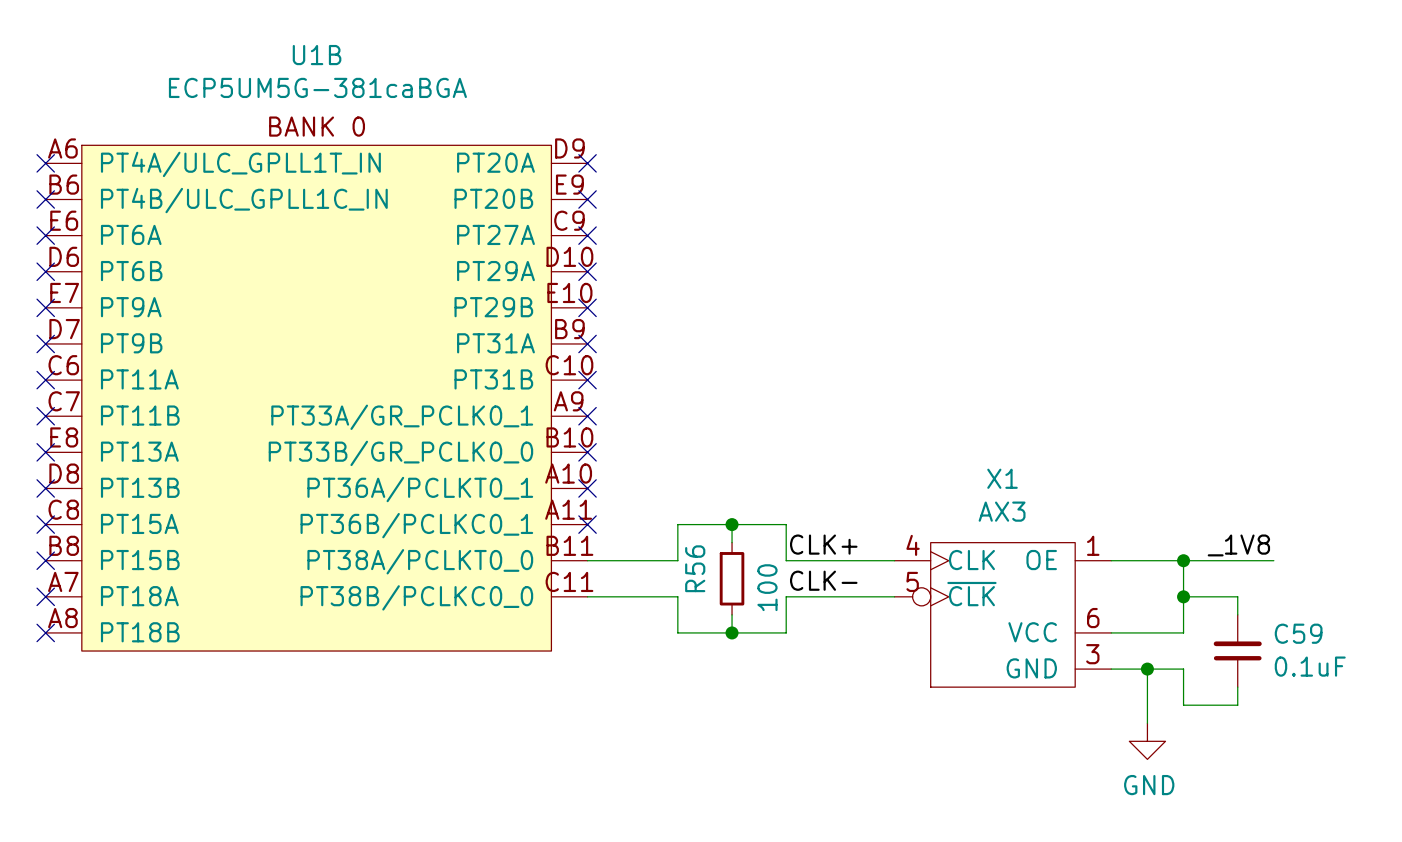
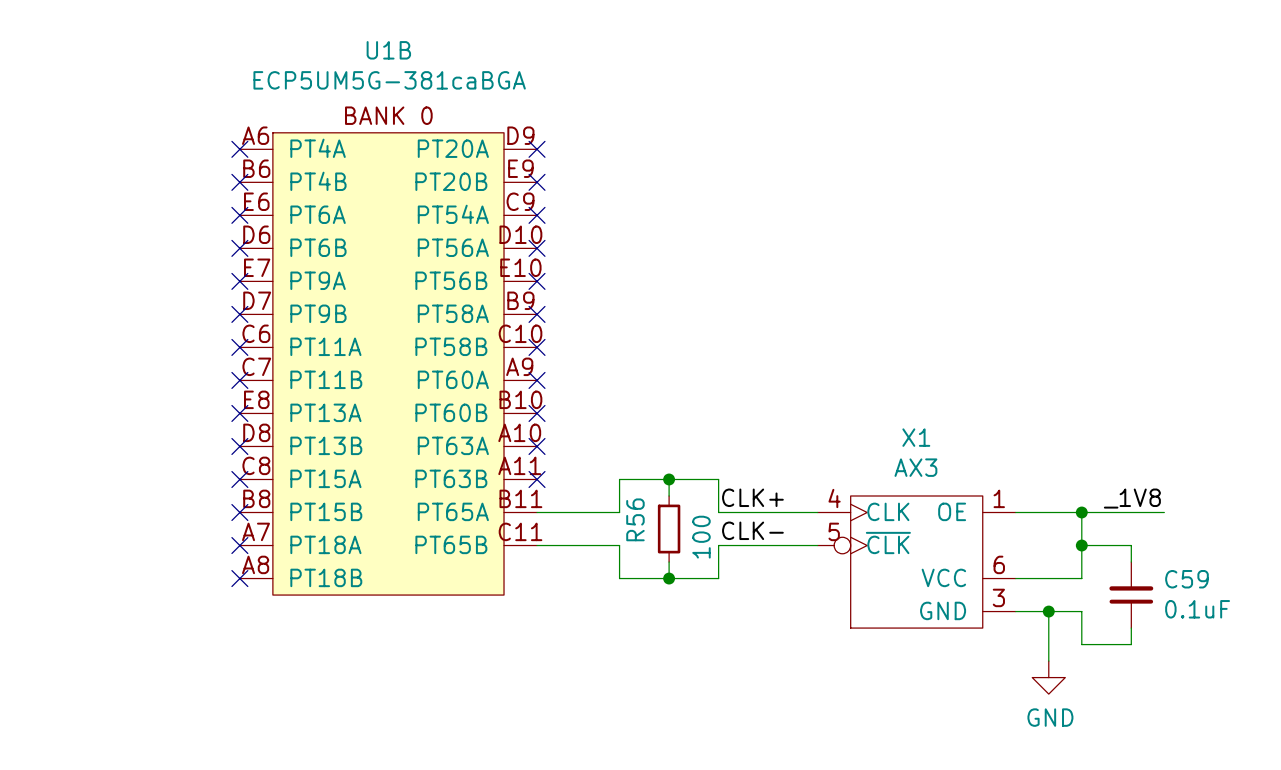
U1B symbol: [45, 145, 588, 652] -> [239, 132, 538, 596]
no-connect mark: (45, 163) -> none
no-connect mark: none -> (239, 149)
no-connect mark: (45, 199) -> none
no-connect mark: none -> (239, 182)
no-connect mark: (45, 235) -> none
no-connect mark: none -> (239, 215)
no-connect mark: (45, 271) -> none
no-connect mark: none -> (239, 248)
no-connect mark: (45, 307) -> none
no-connect mark: none -> (239, 281)
no-connect mark: (45, 343) -> none
no-connect mark: none -> (239, 314)
no-connect mark: (45, 380) -> none
no-connect mark: none -> (239, 347)
no-connect mark: (45, 416) -> none
no-connect mark: none -> (239, 380)
no-connect mark: (45, 452) -> none
no-connect mark: none -> (239, 413)
no-connect mark: (45, 488) -> none
no-connect mark: none -> (239, 446)
no-connect mark: (45, 524) -> none
no-connect mark: none -> (239, 479)
no-connect mark: (45, 560) -> none
no-connect mark: none -> (239, 512)
no-connect mark: (45, 596) -> none
no-connect mark: none -> (239, 545)
no-connect mark: (45, 632) -> none
no-connect mark: none -> (239, 578)

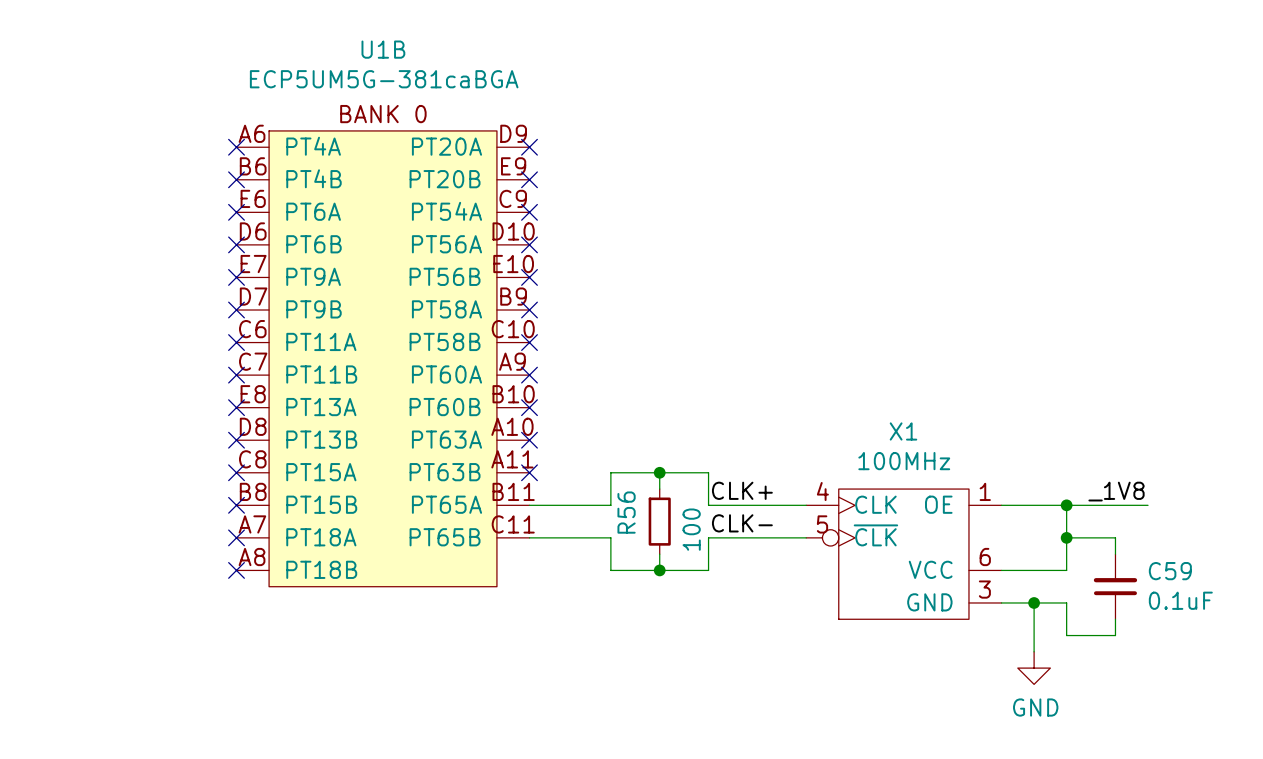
X1 value: AX3 (915, 467) -> 100MHz (904, 461)

